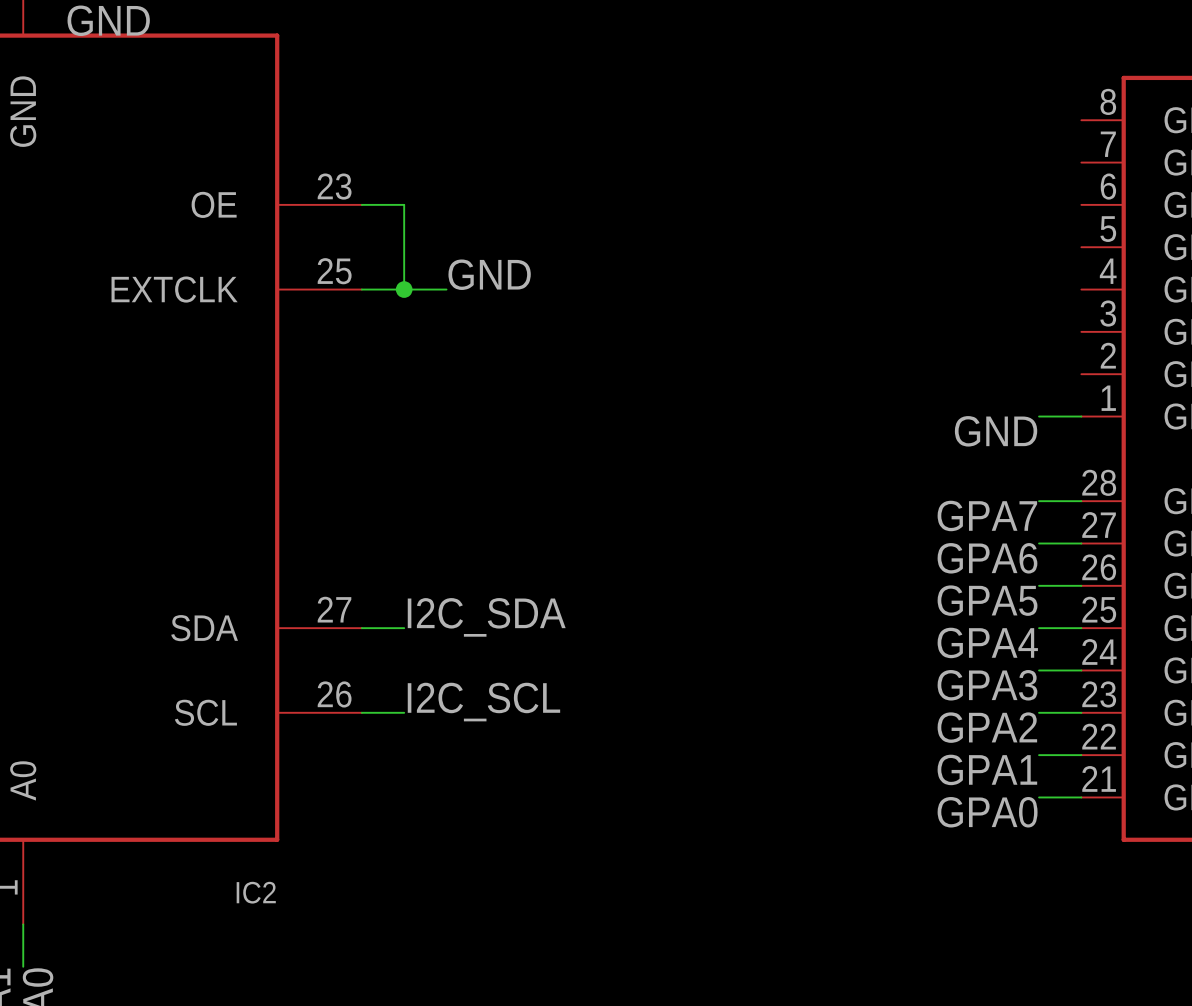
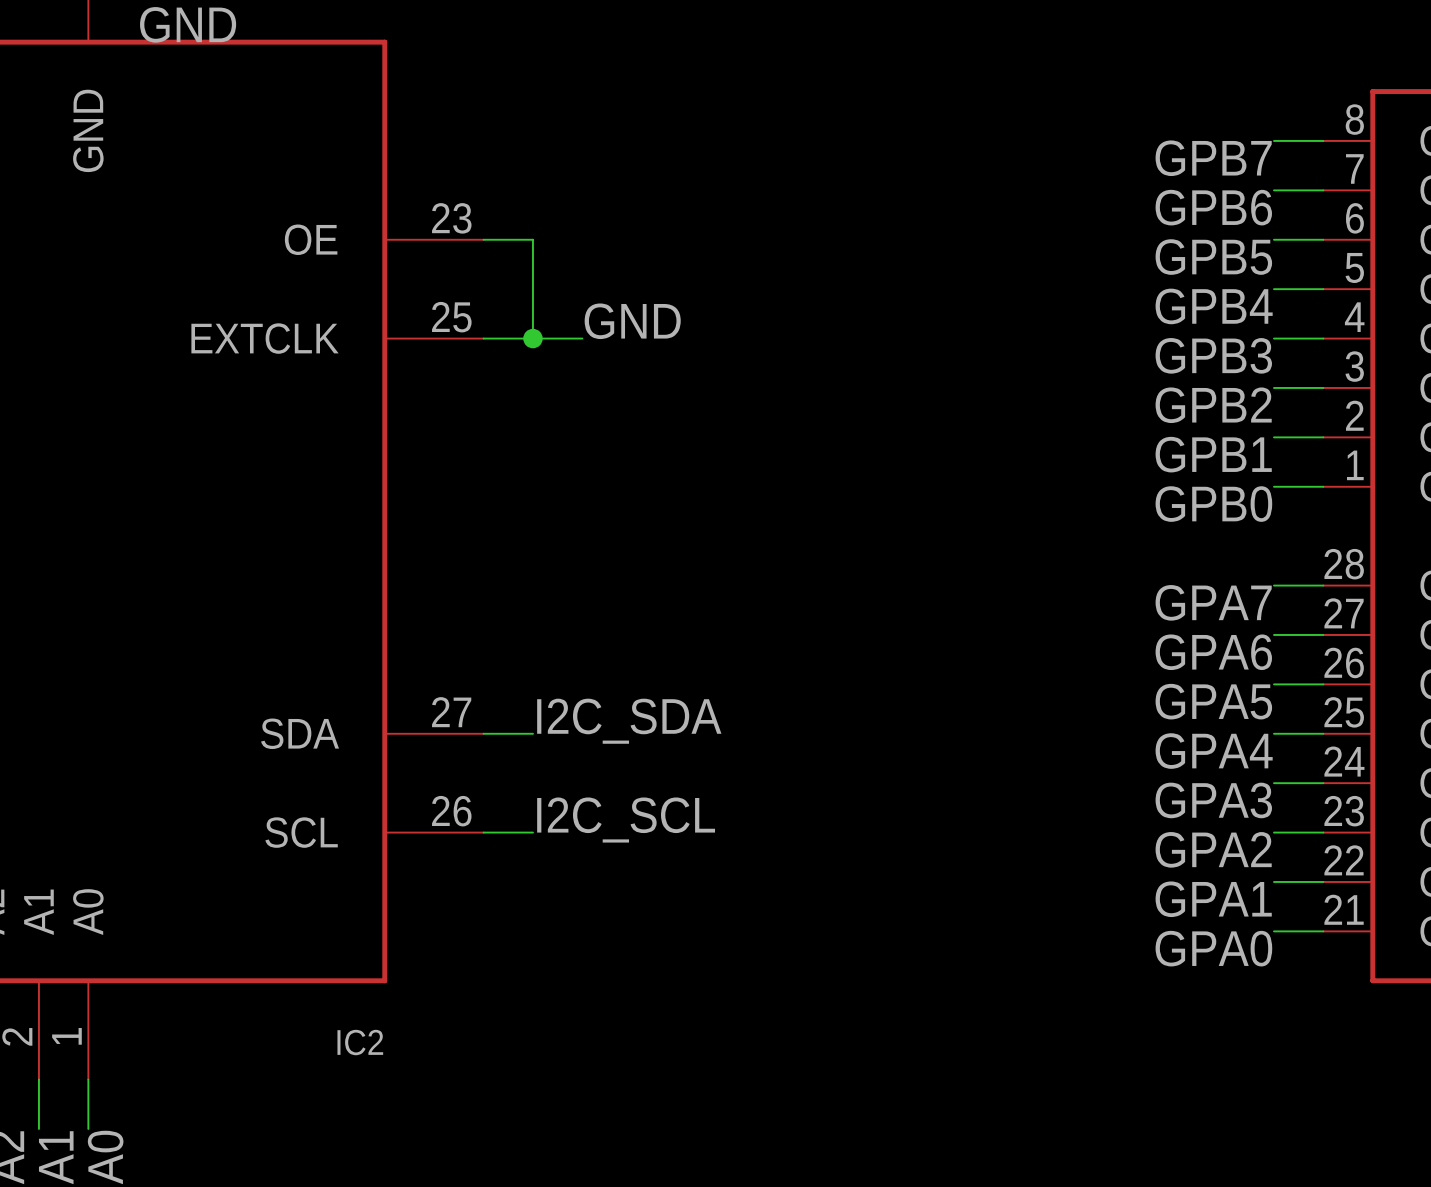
wire: none -> (1273, 140) (1323, 140)
label: none -> GPB7 (1213, 158)
wire: none -> (1273, 190) (1323, 190)
label: none -> GPB6 (1213, 207)
wire: none -> (1273, 239) (1323, 239)
label: none -> GPB5 (1213, 257)
wire: none -> (1273, 289) (1323, 289)
label: none -> GPB4 (1214, 306)
wire: none -> (1273, 338) (1323, 338)
label: none -> GPB3 (1213, 355)
wire: none -> (1273, 387) (1323, 387)
label: none -> GPB2 (1213, 405)
wire: none -> (1273, 437) (1323, 437)
label: none -> GPB1 (1213, 454)
label: GND (996, 431) -> GPB0 (1213, 504)

